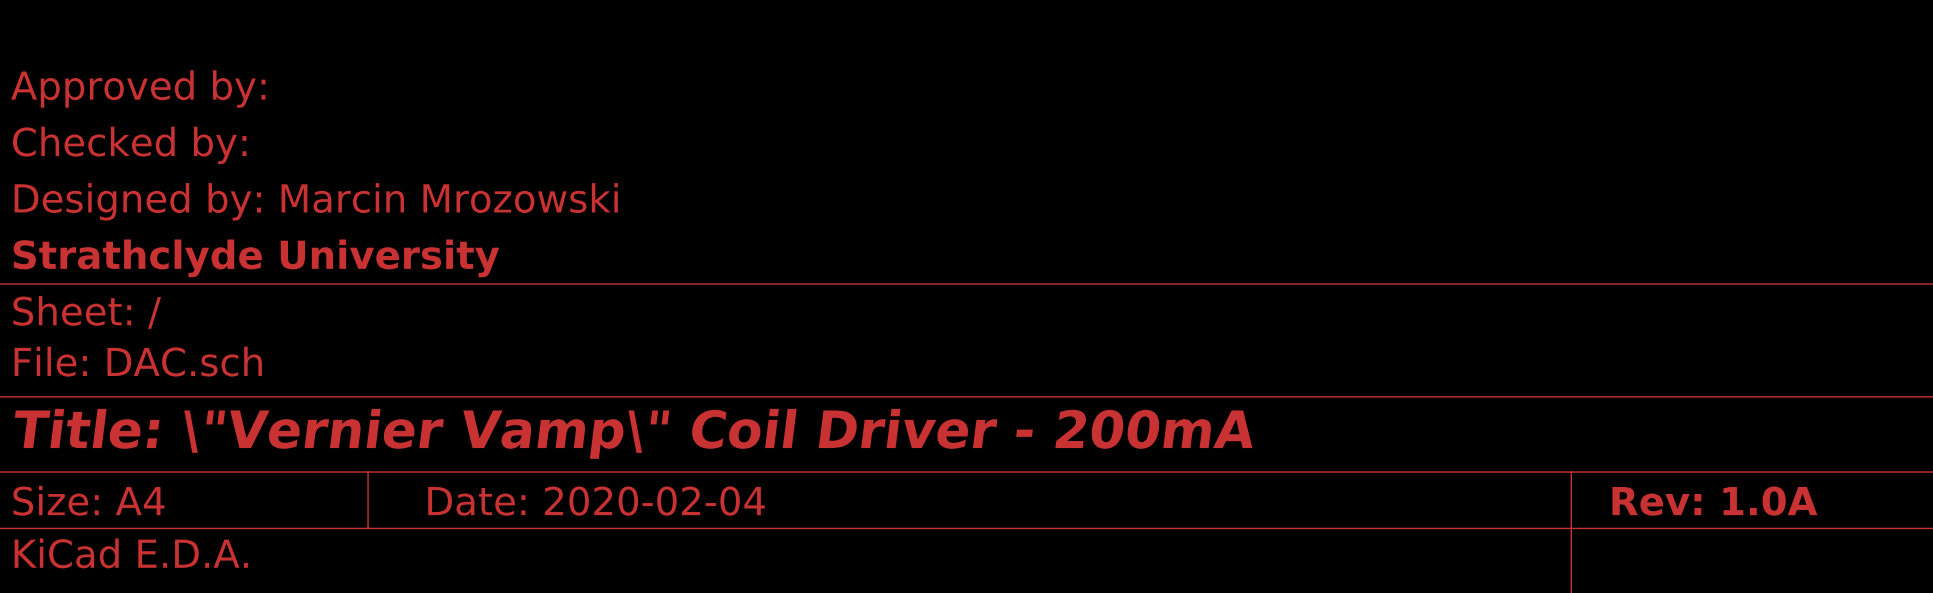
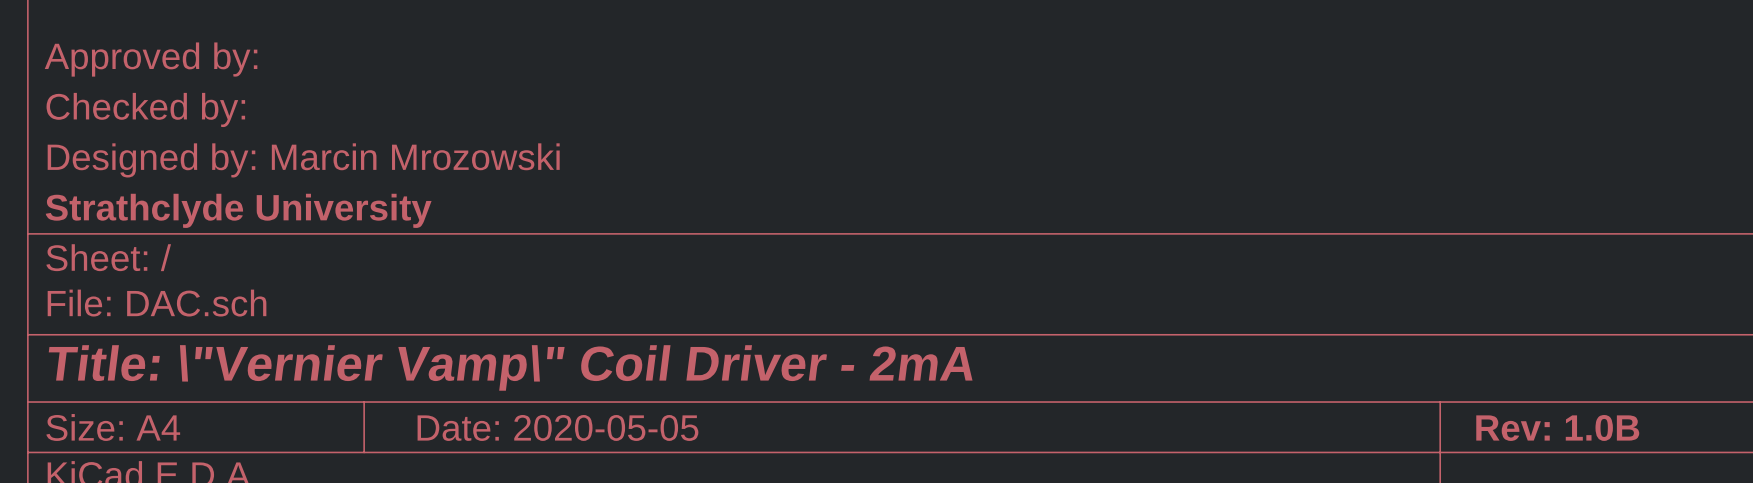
title block: Title: \"Vernier Vamp\" Coil Driver - 200mA (633, 433) -> Title: \"Vernier Vamp\" Coil Driver - 2mA (510, 367)
title block: Date: 2020-02-04 (596, 501) -> Date: 2020-05-05 (557, 427)
title block: Rev: 1.0A (1714, 501) -> Rev: 1.0B (1557, 427)

